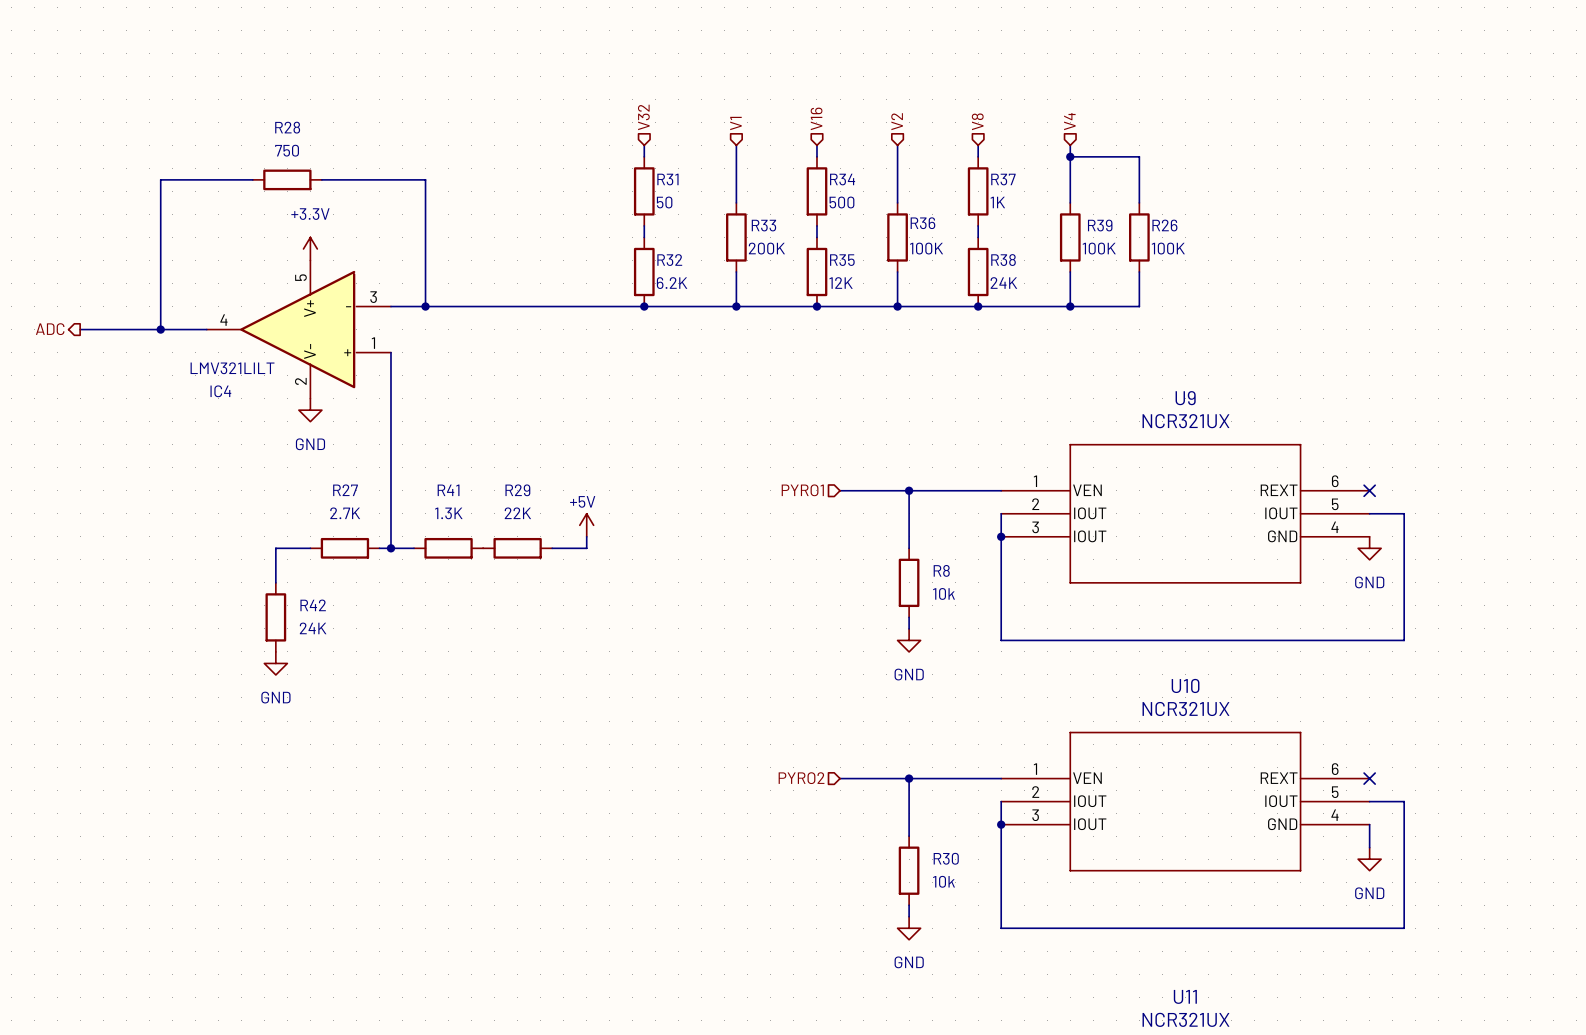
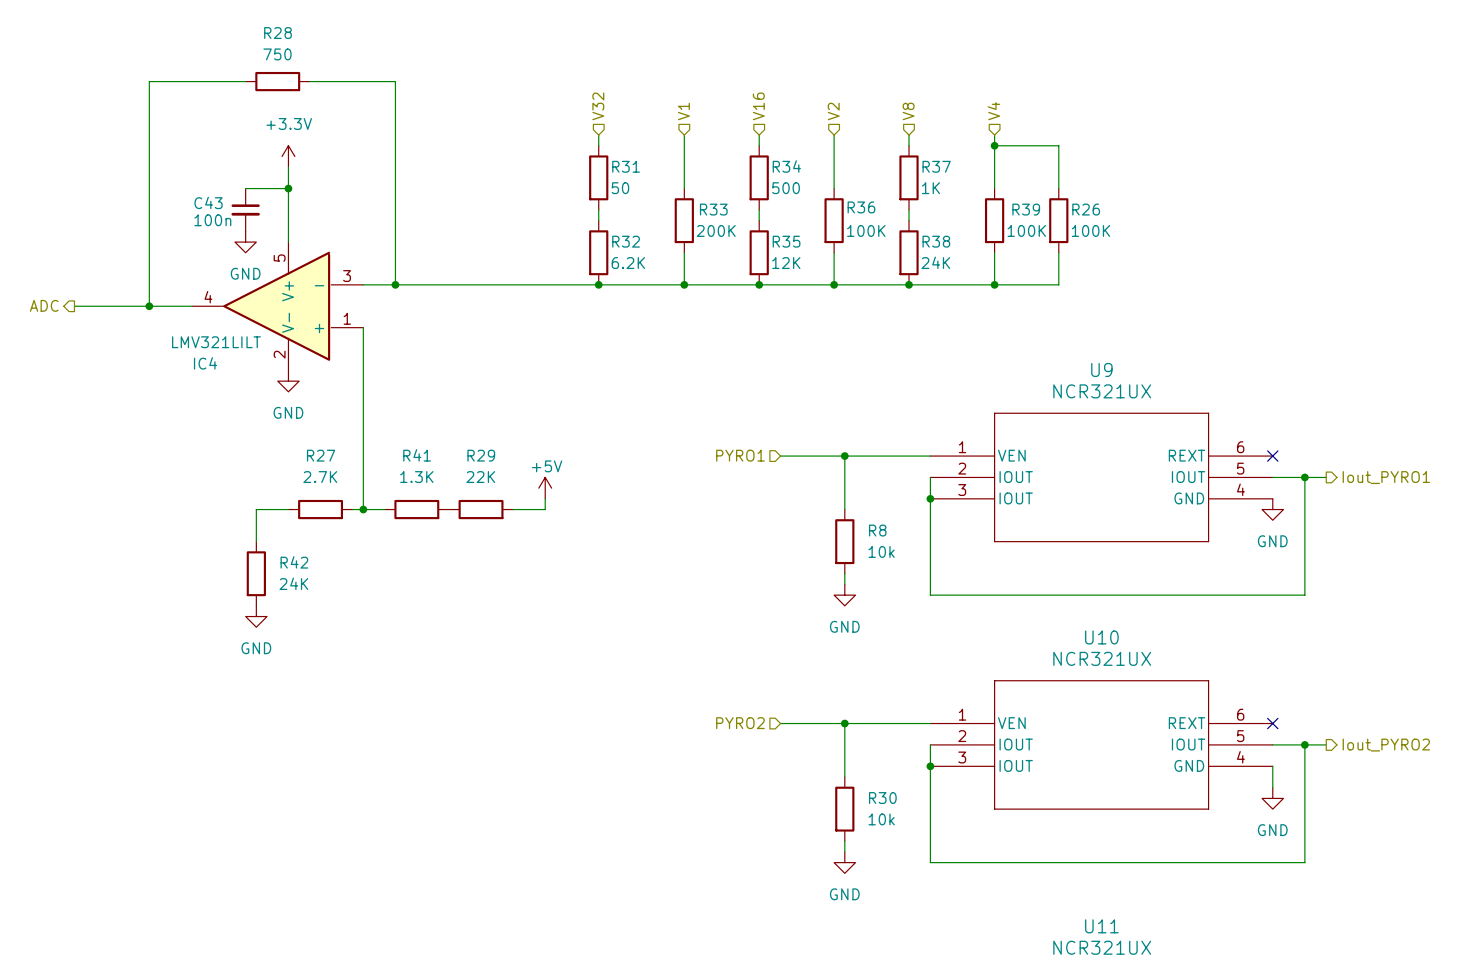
wire: (160, 179) (252, 179) -> (149, 167) (149, 81) (245, 81)
R28 position: (287, 179) -> (277, 81)
wire: none -> (288, 167) (288, 242)
wire: (321, 179) (425, 179) -> (309, 81) (395, 81) (395, 167)
wire: none -> (245, 188) (288, 188)
junction: none -> (288, 188)
C43: none -> 100n (245, 209)
power symbol position: +3.3V (310, 248) -> +3.3V (288, 156)
power symbol: none -> GND (245, 242)
wire: none -> (1304, 477) (1326, 477)
junction: none -> (1304, 477)
hierarchical label: none -> Iout_PYRO1 (1386, 477)
wire: none -> (1304, 744) (1326, 744)
junction: none -> (1304, 744)
hierarchical label: none -> Iout_PYRO2 (1386, 745)

